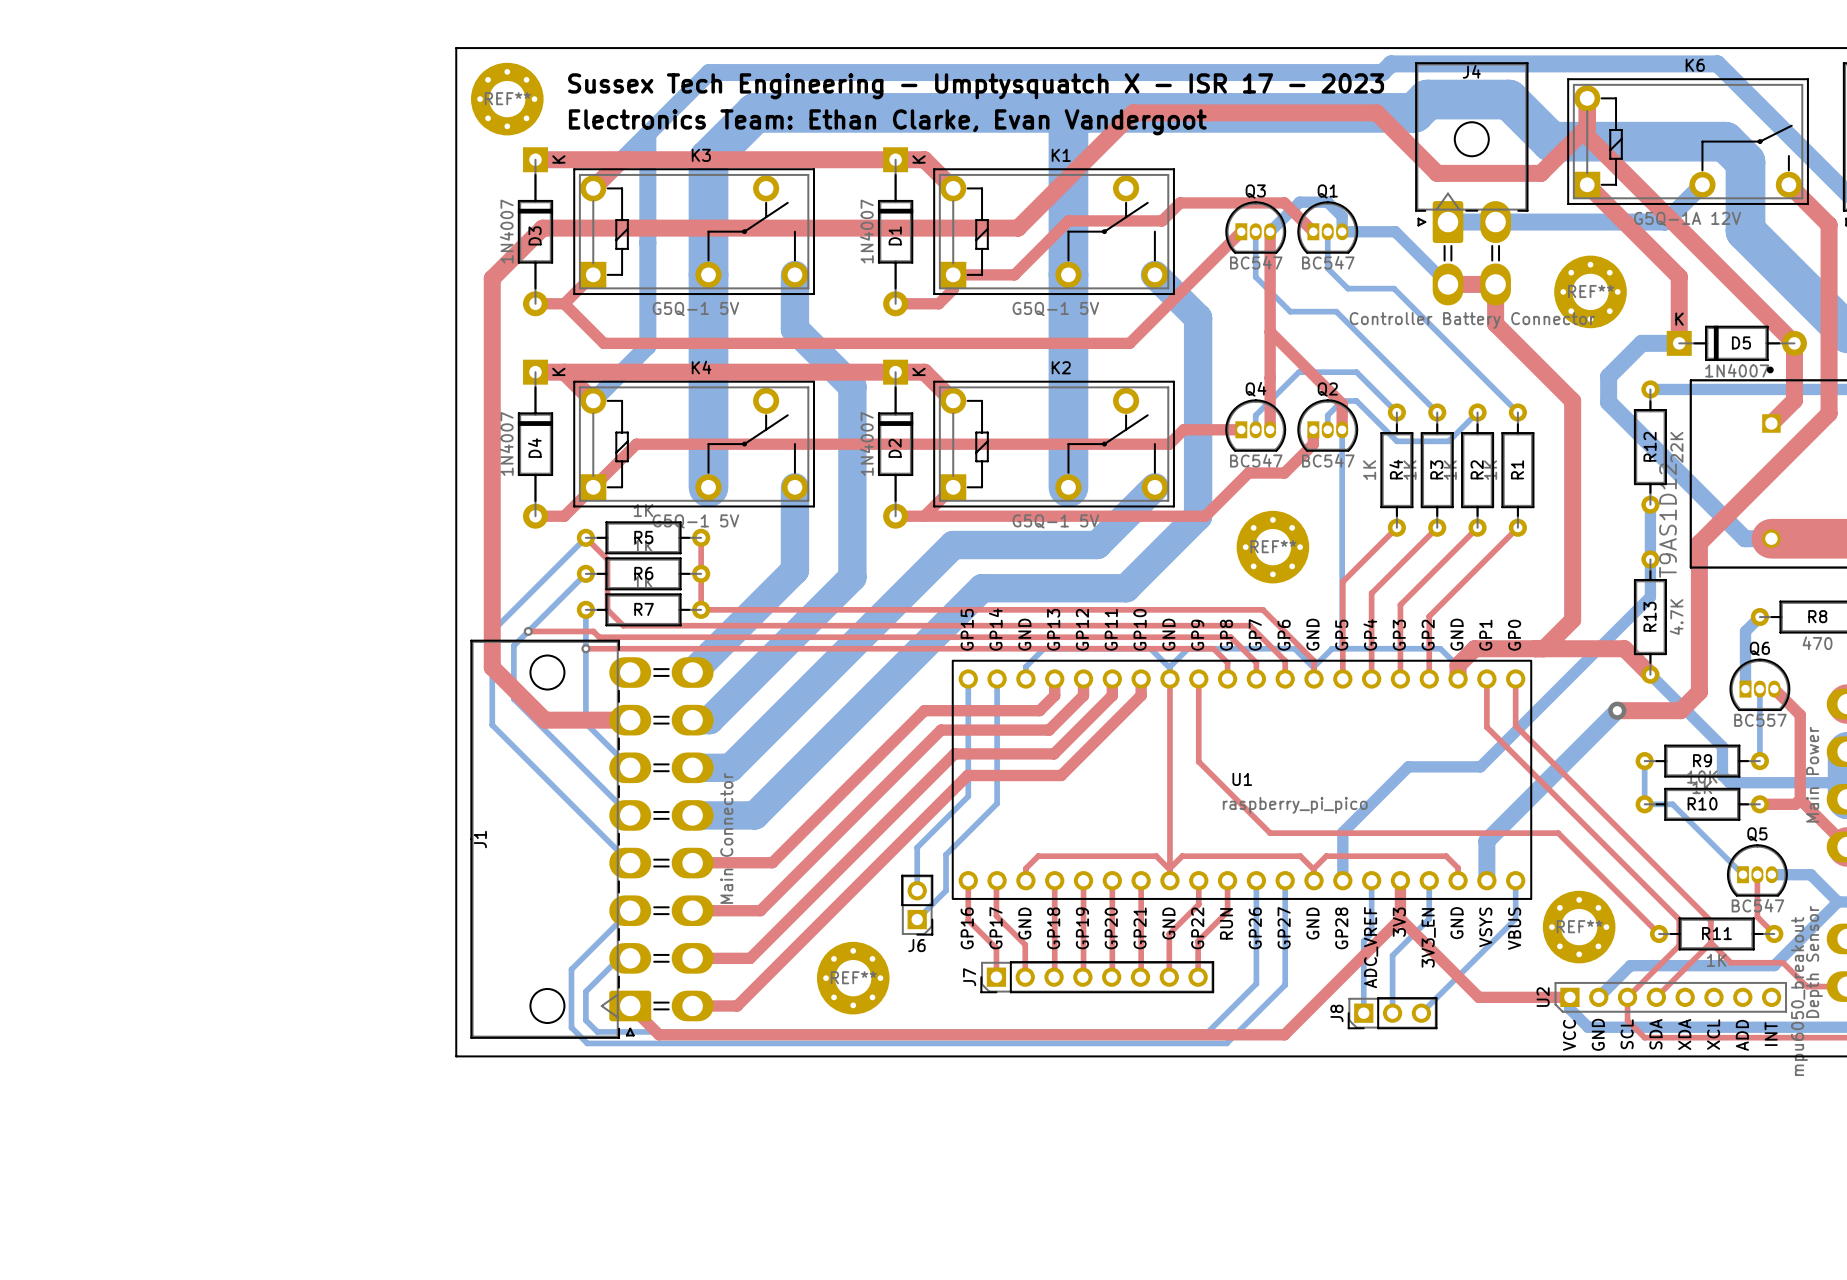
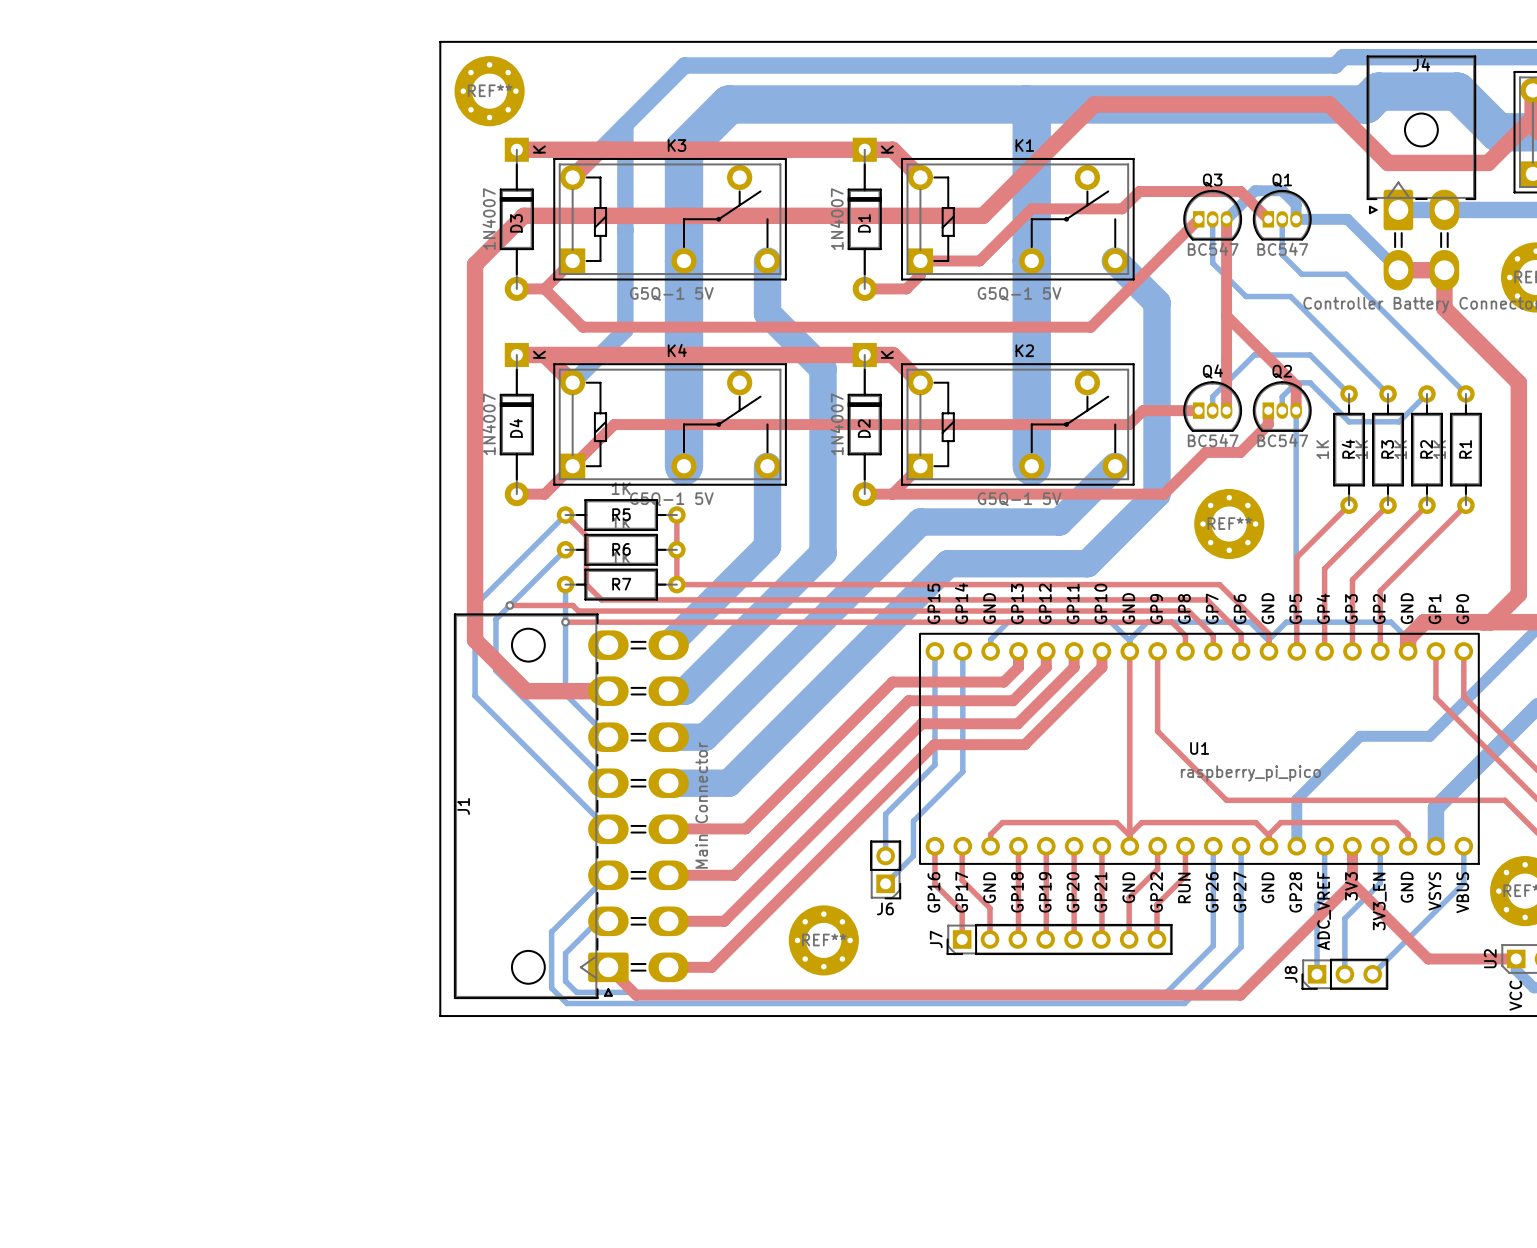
text: Sussex Tech Engineering - Umptysquatch X - ISR 17 - 2023 (976, 86) -> none
text: Electronics Team: Ethan Clarke, Evan Vandergoot (887, 122) -> none

